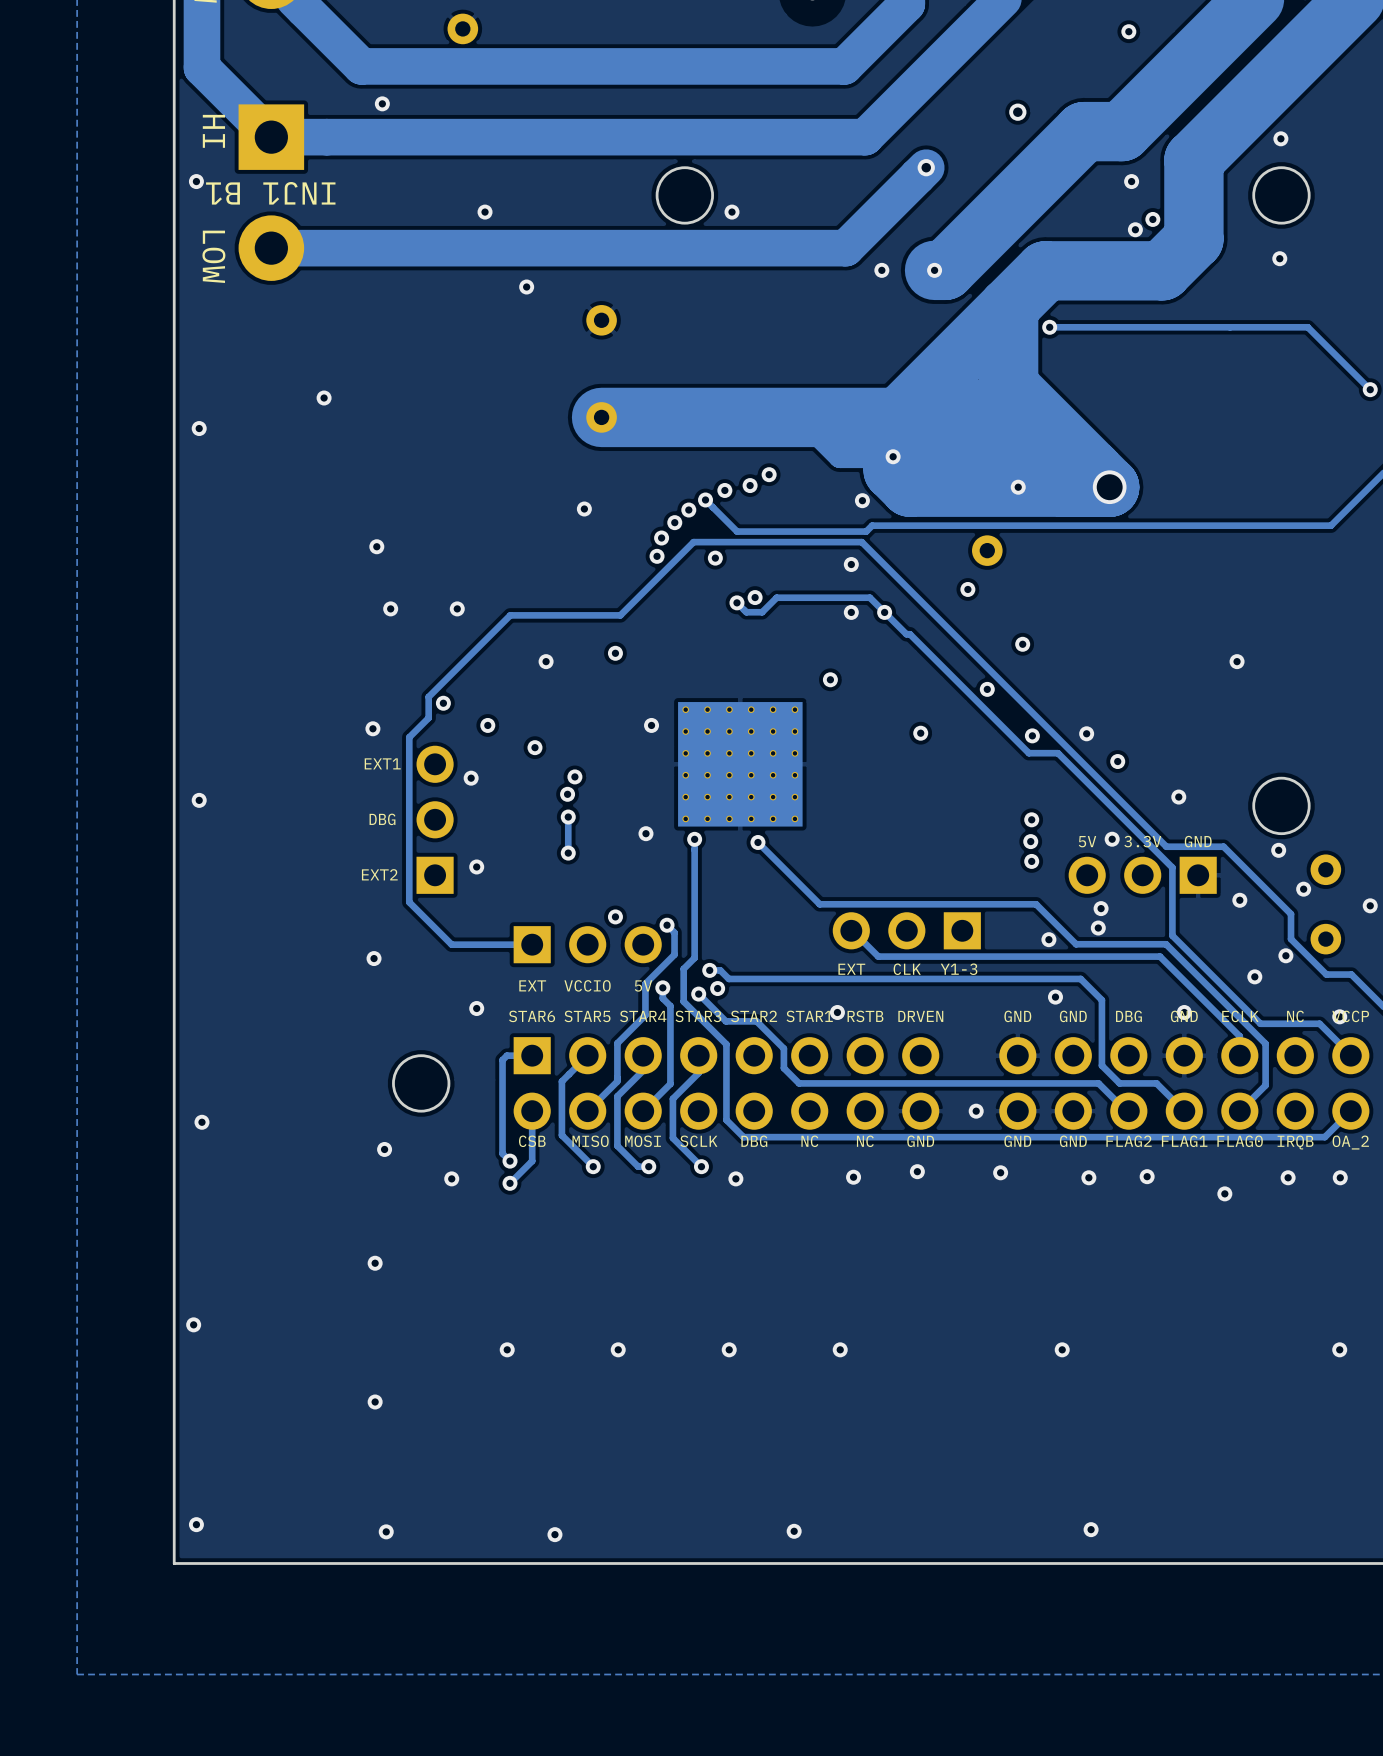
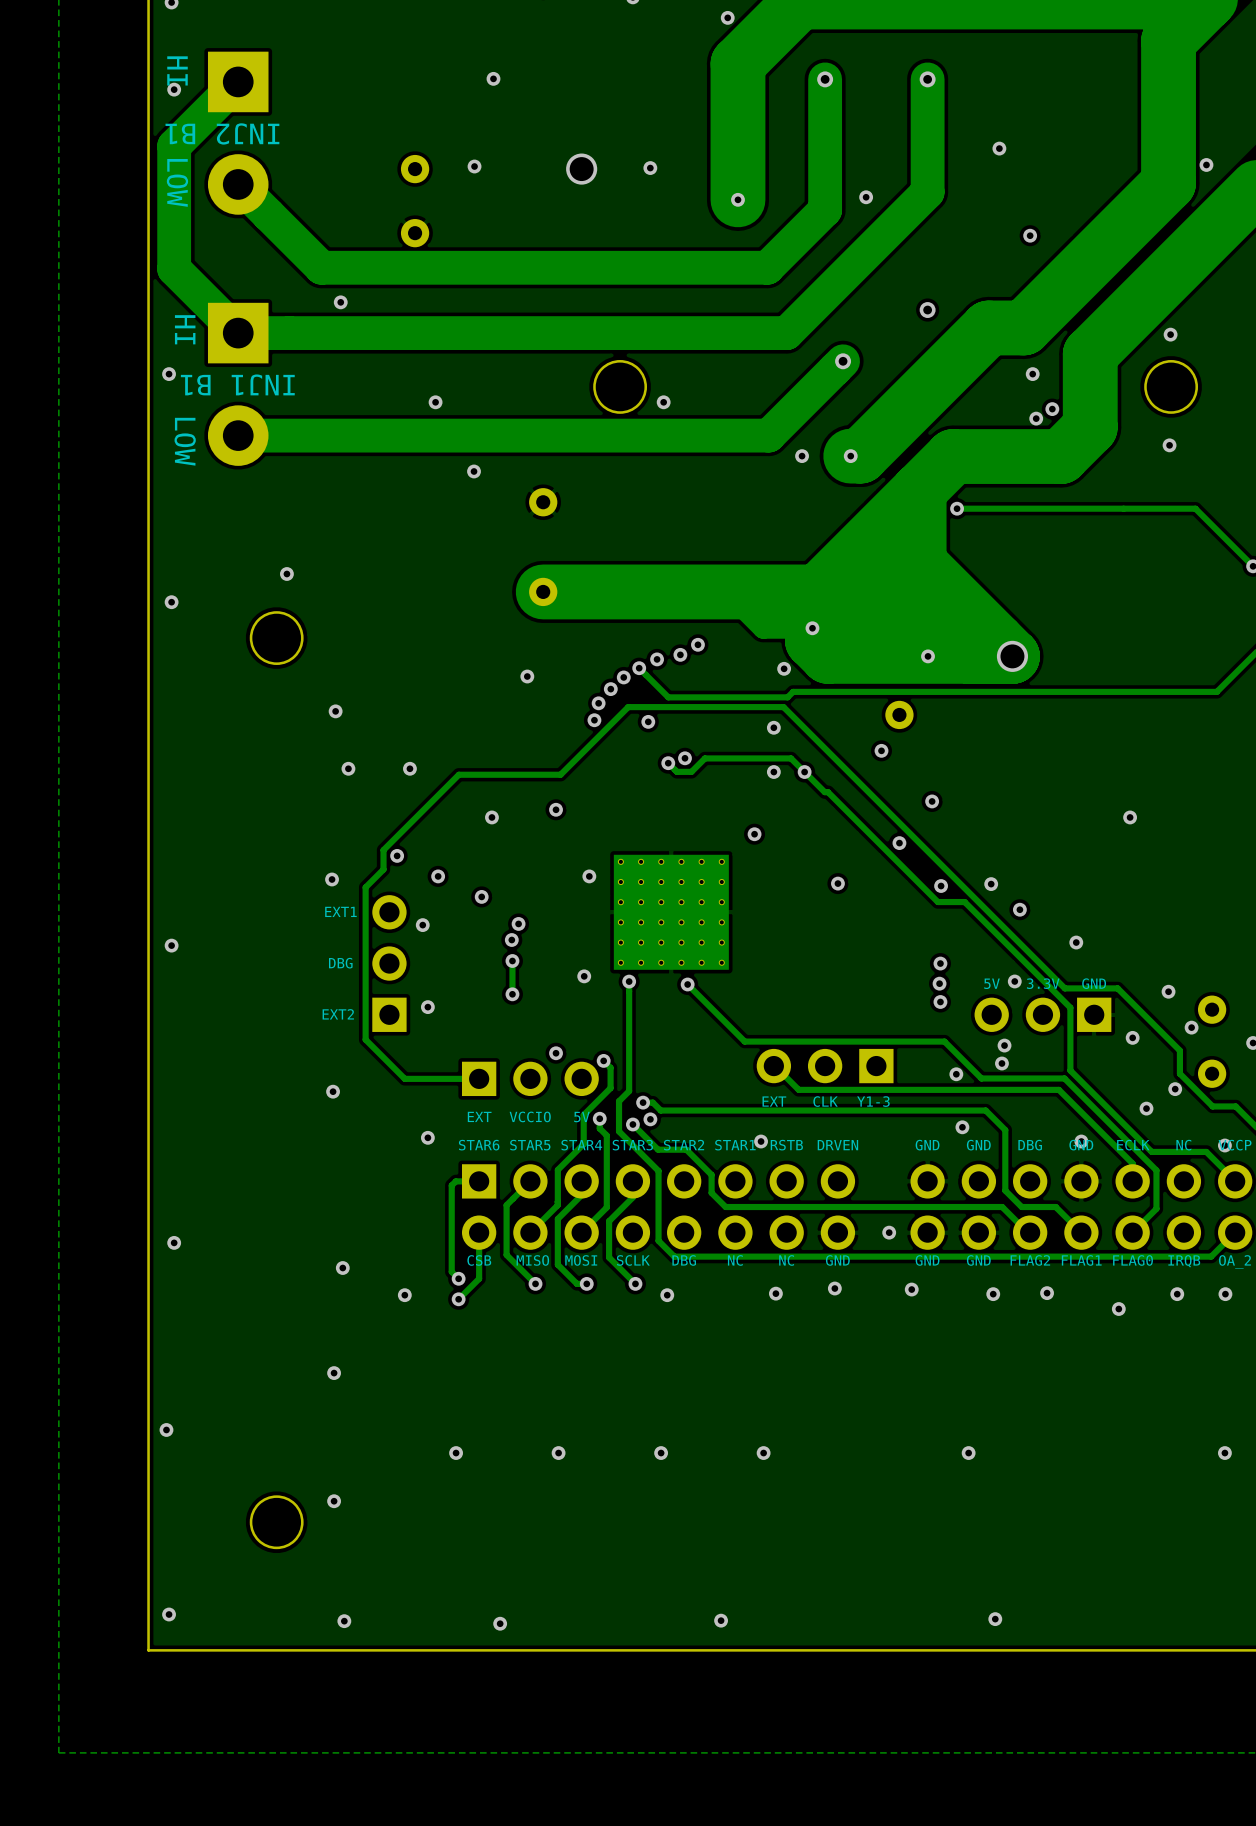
round board edge: none -> [249, 611, 304, 665]
round board edge: [1252, 776, 1311, 836] -> none
round board edge: [392, 1054, 451, 1113] -> none
round board edge: none -> [249, 1495, 304, 1550]

